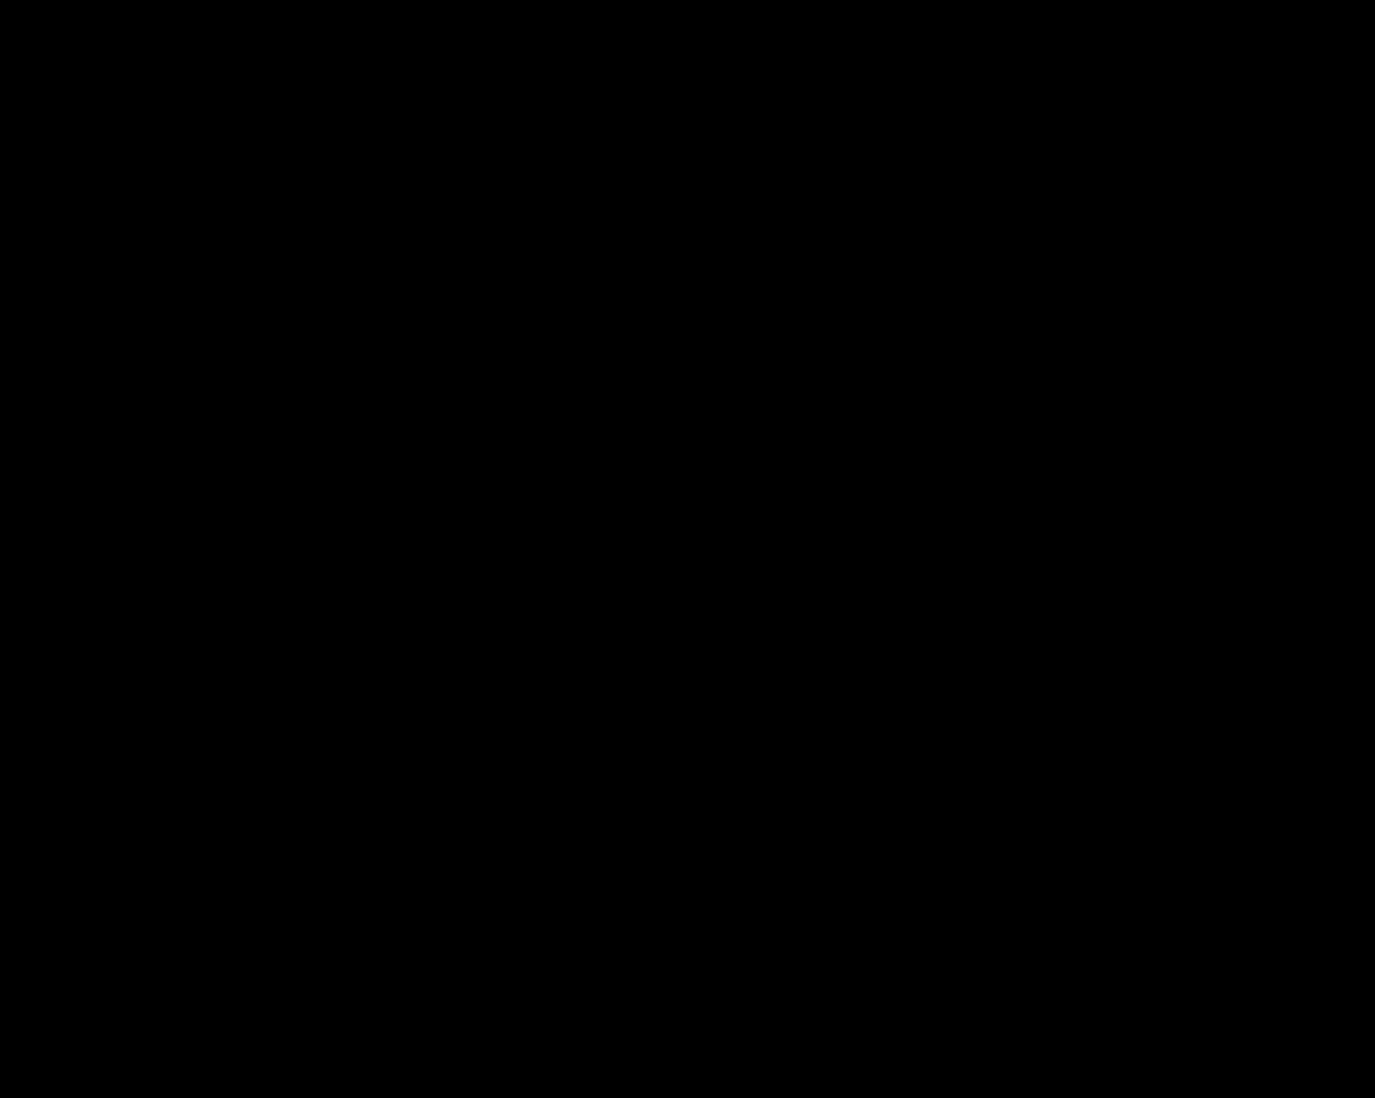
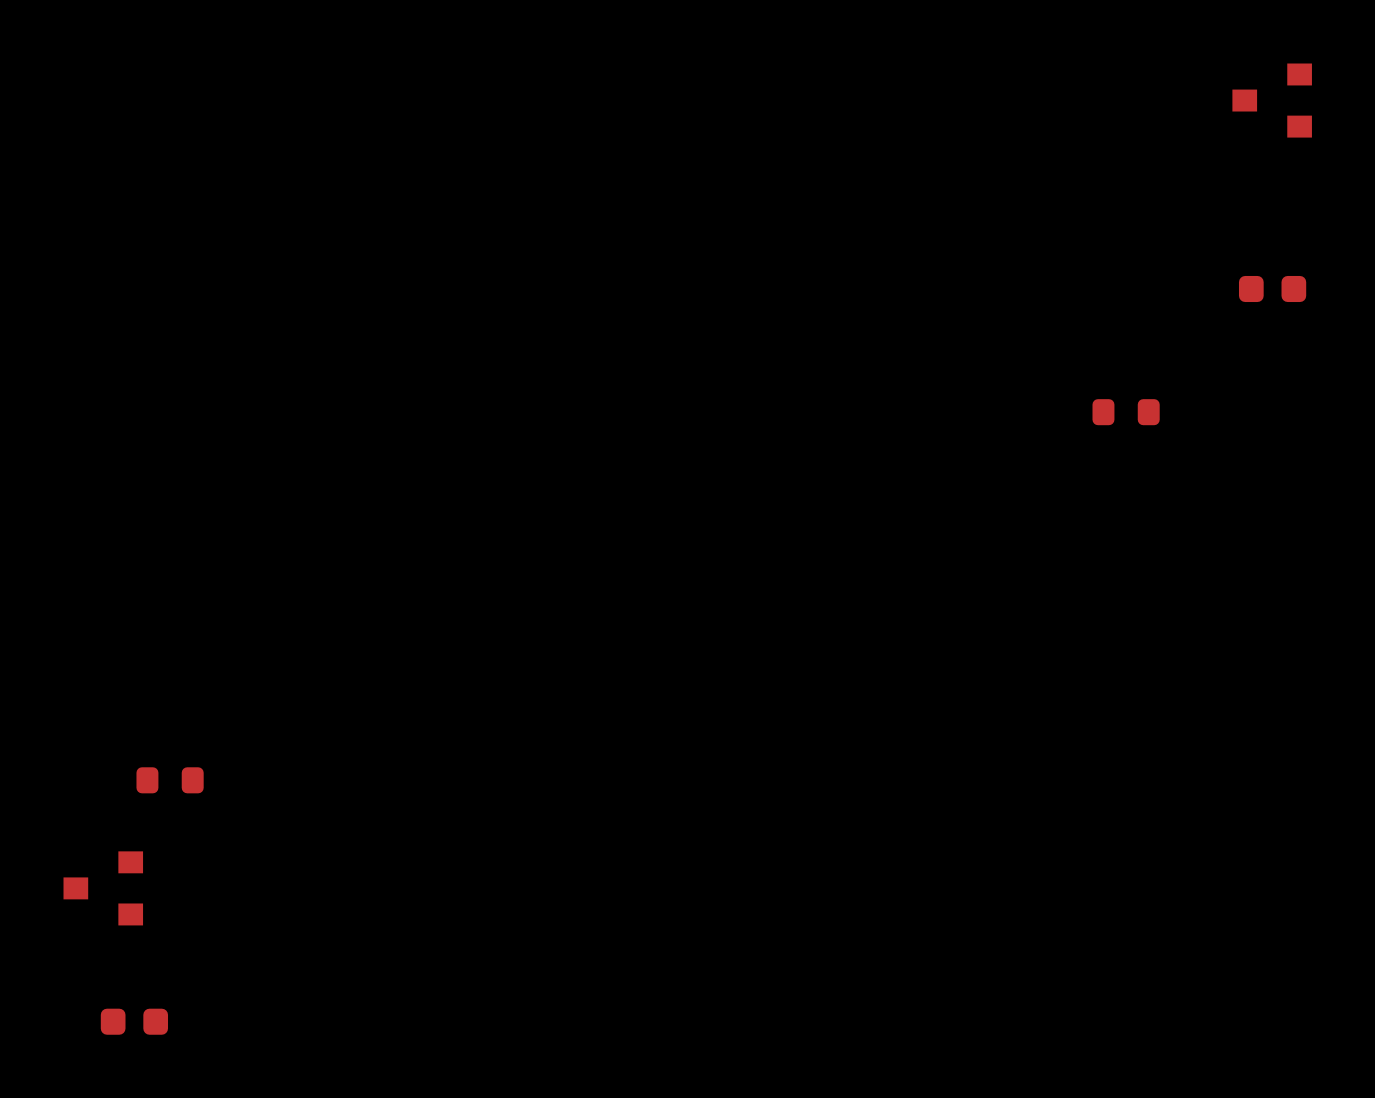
part: none -> (1272, 100)
part: none -> (1272, 288)
part: none -> (1126, 412)
part: none -> (170, 780)
part: none -> (103, 888)
part: none -> (134, 1021)

